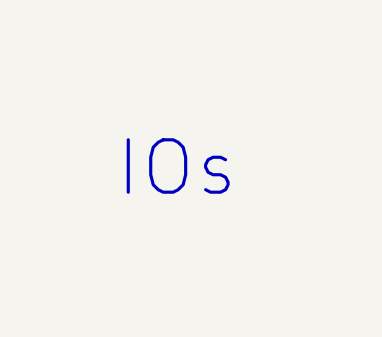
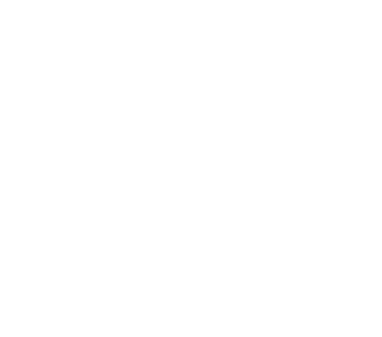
text: IOs (178, 166) -> none

